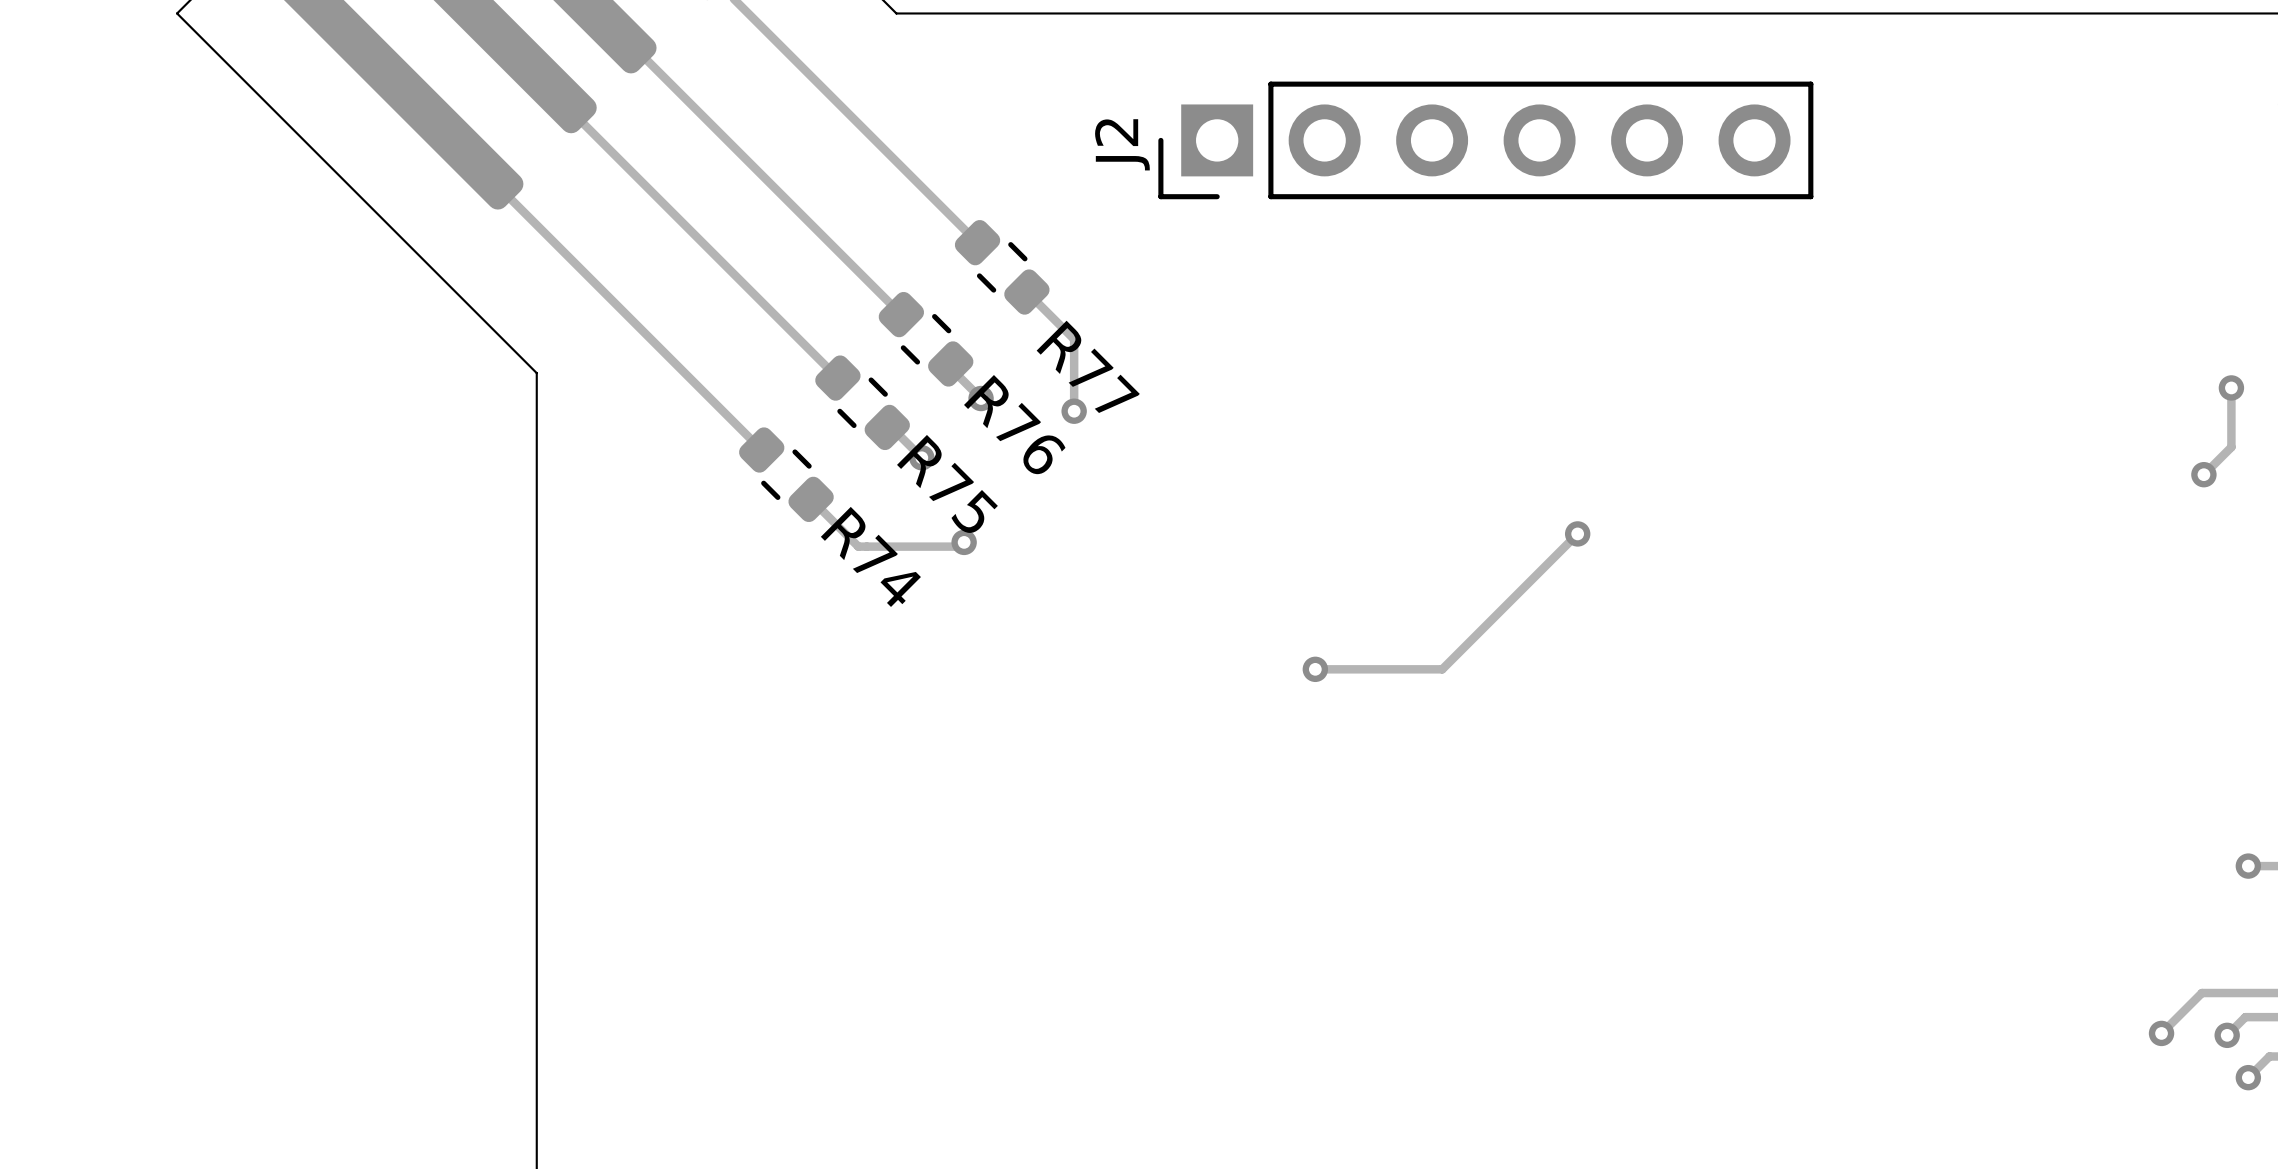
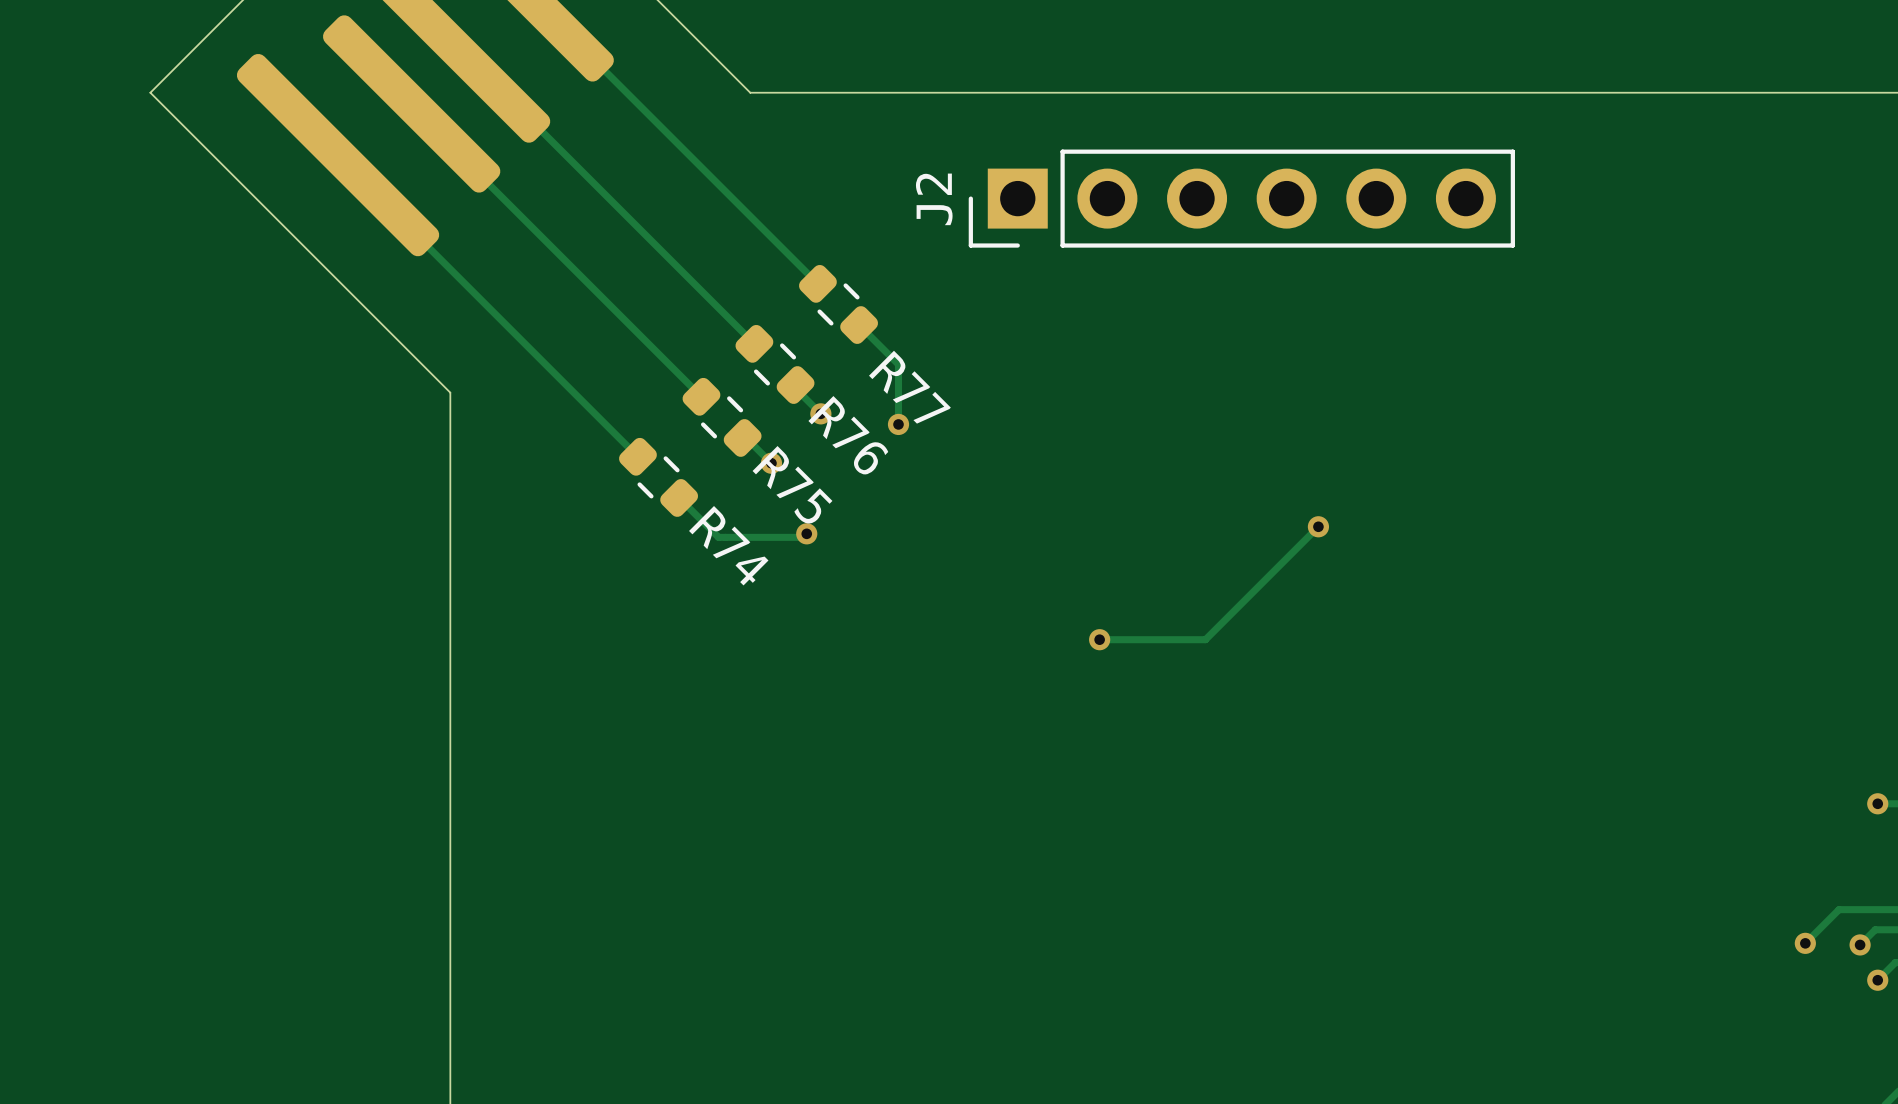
track: (2229, 387) (2231, 387) (2231, 447) (2203, 474) -> none
via: (2231, 387) -> none
via: (2203, 474) -> none

